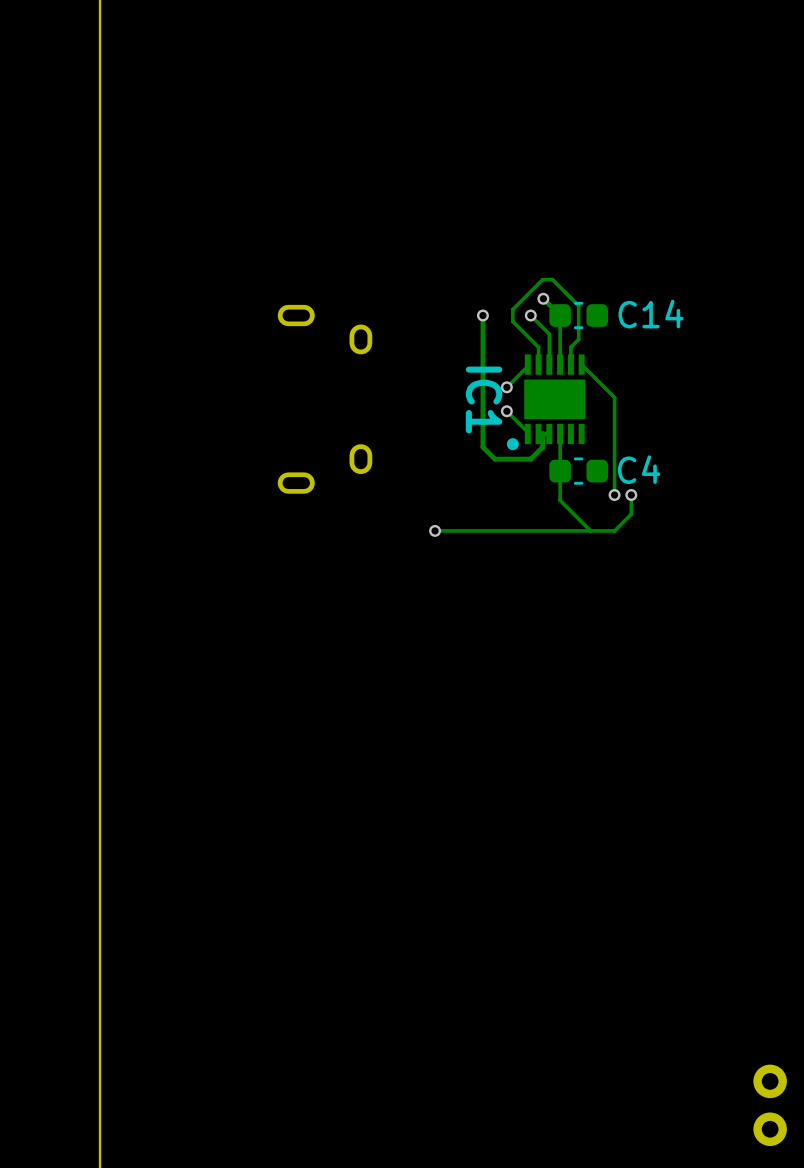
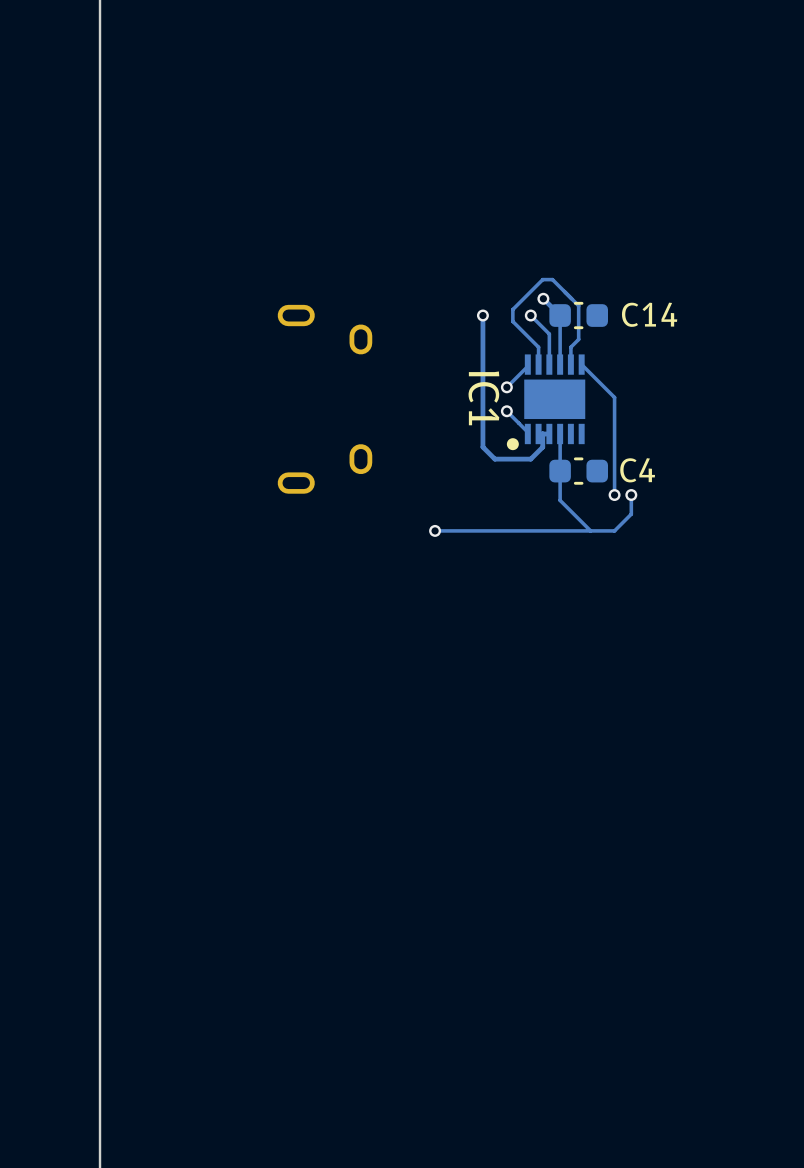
part: (770, 1105) -> none

